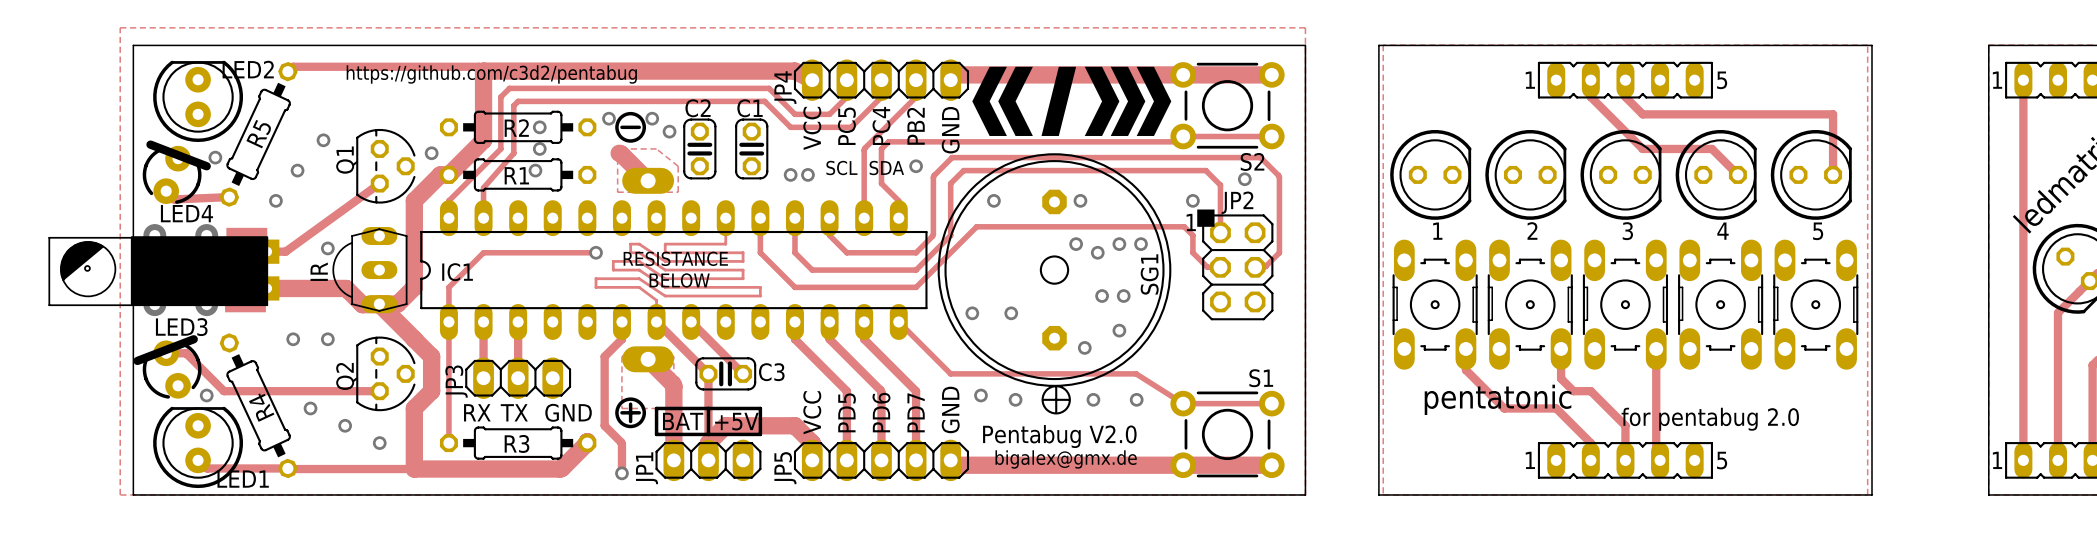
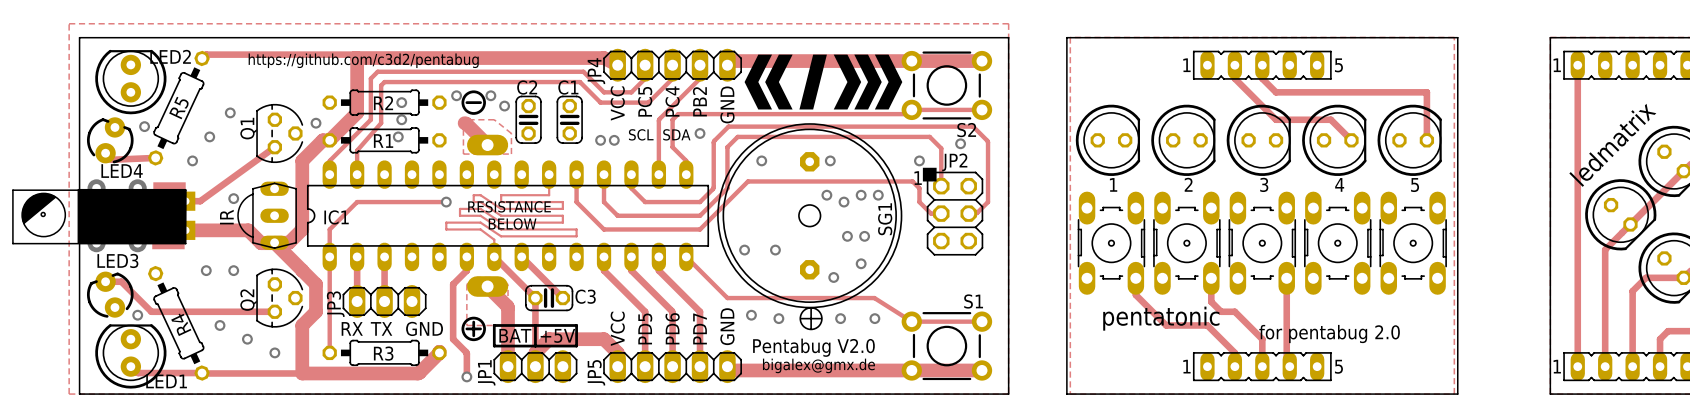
line: (150, 144) (206, 166) -> none
line: (193, 339) (137, 360) -> none

